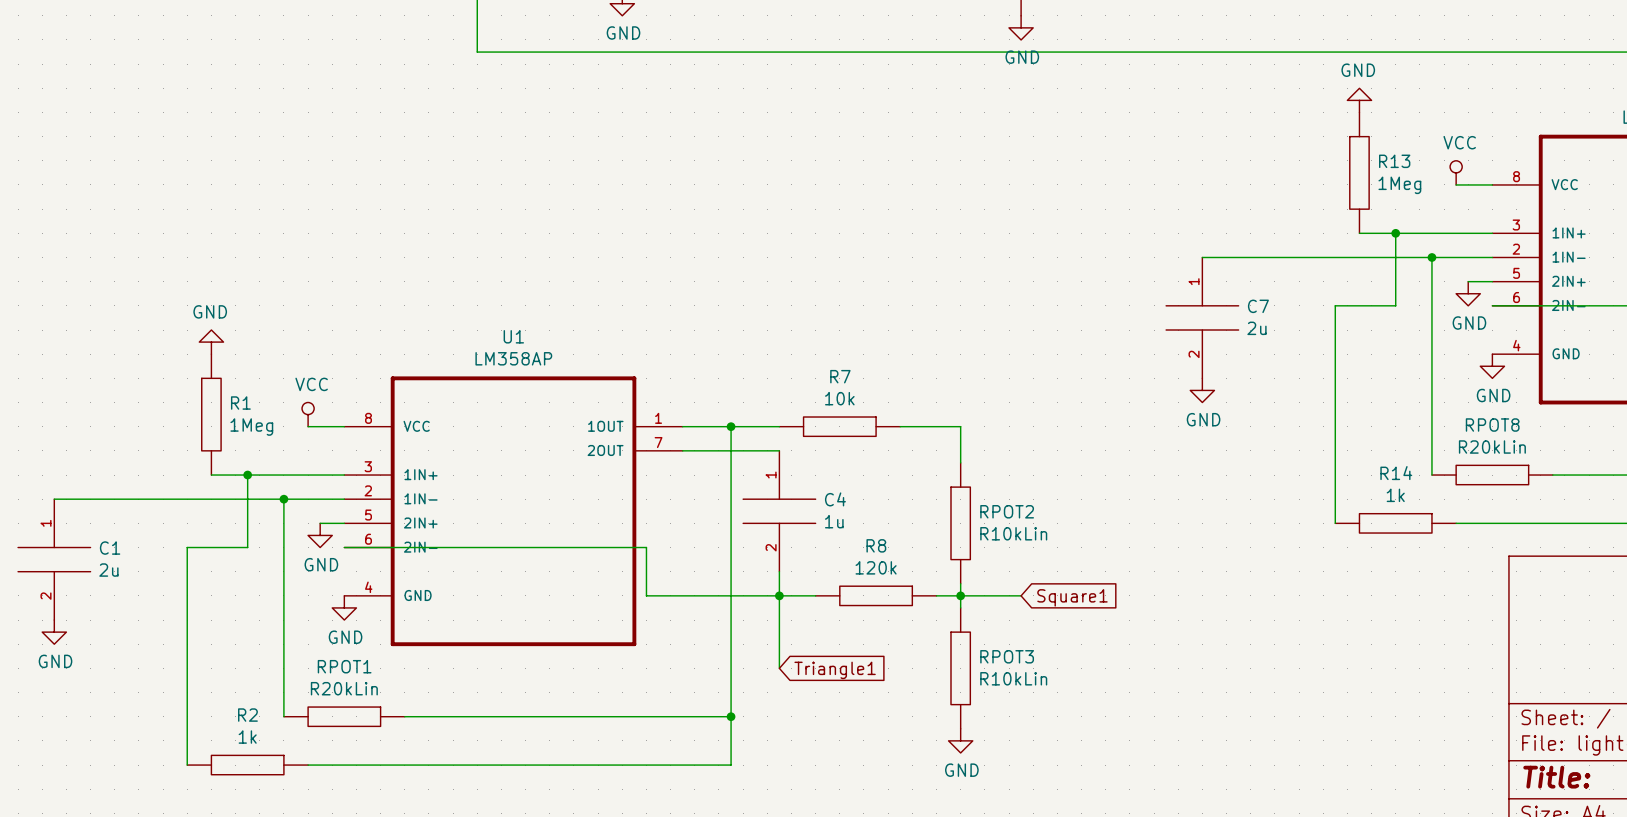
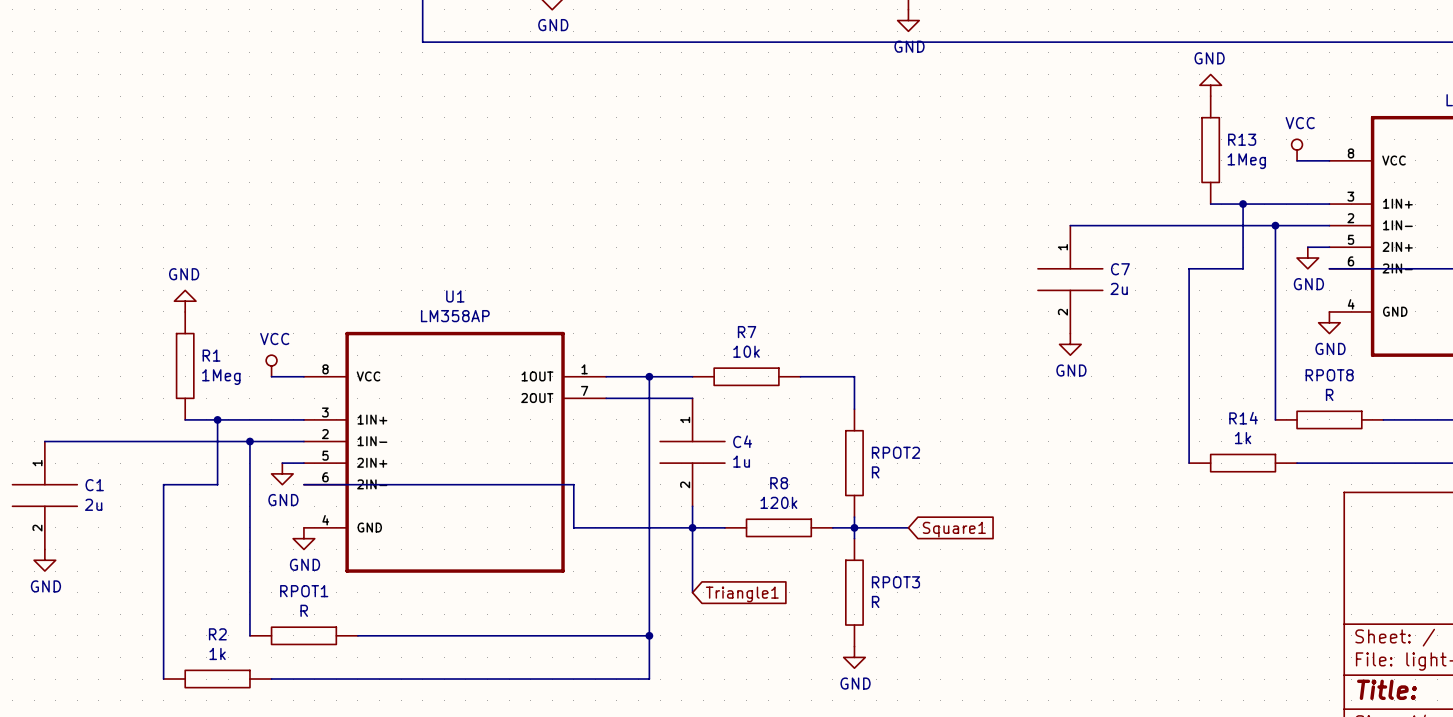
RPOT8 value: R20kLin (1492, 447) -> R (1329, 394)
RPOT2 value: R10kLin (1013, 533) -> R (875, 472)
RPOT3 value: R10kLin (1013, 678) -> R (875, 601)
RPOT1 value: R20kLin (344, 688) -> R (304, 610)

